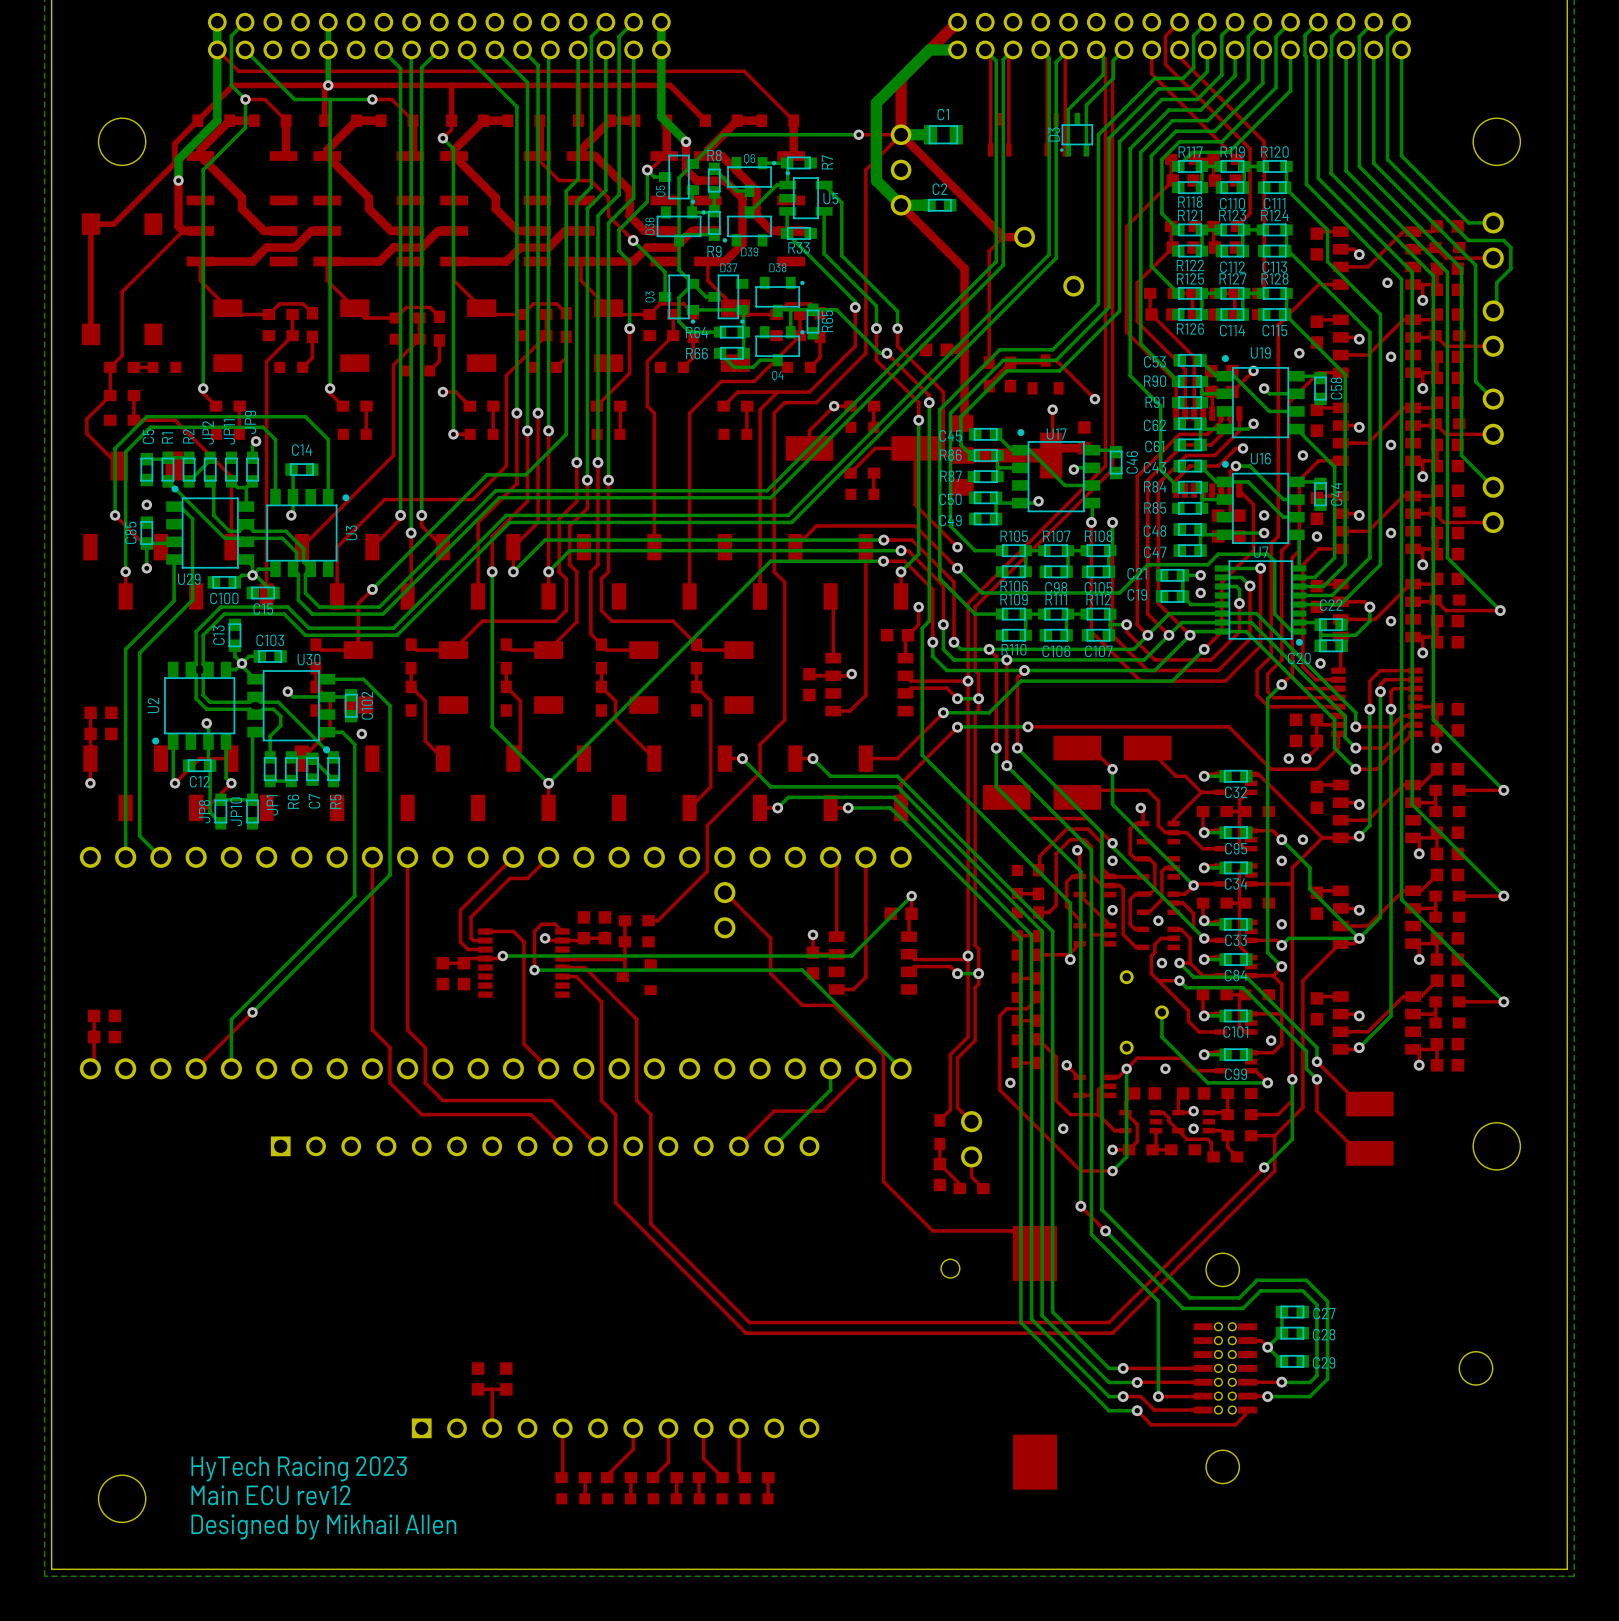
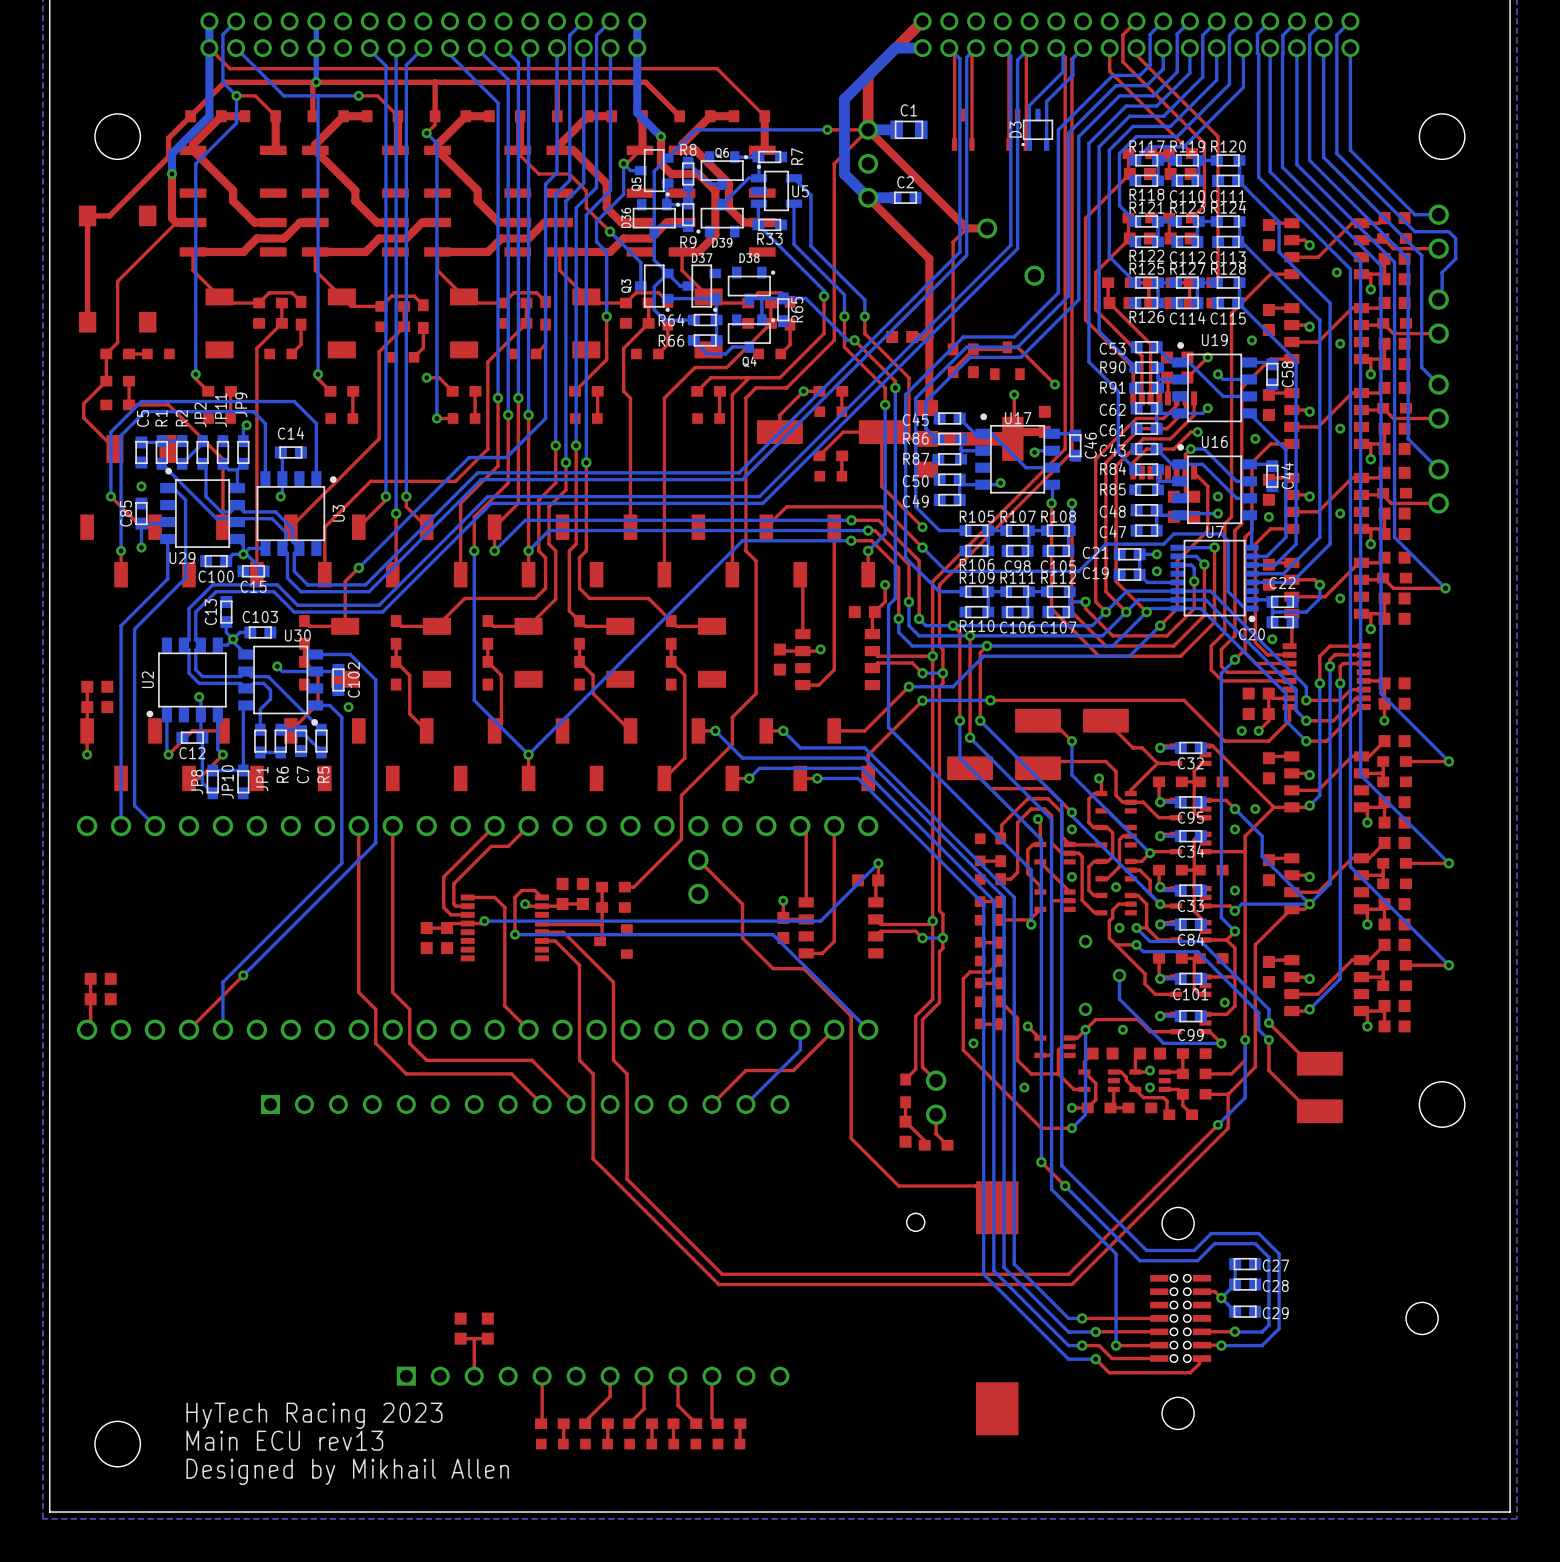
text: Main ECU rev12 (271, 1495) -> Main ECU rev13 (284, 1440)

